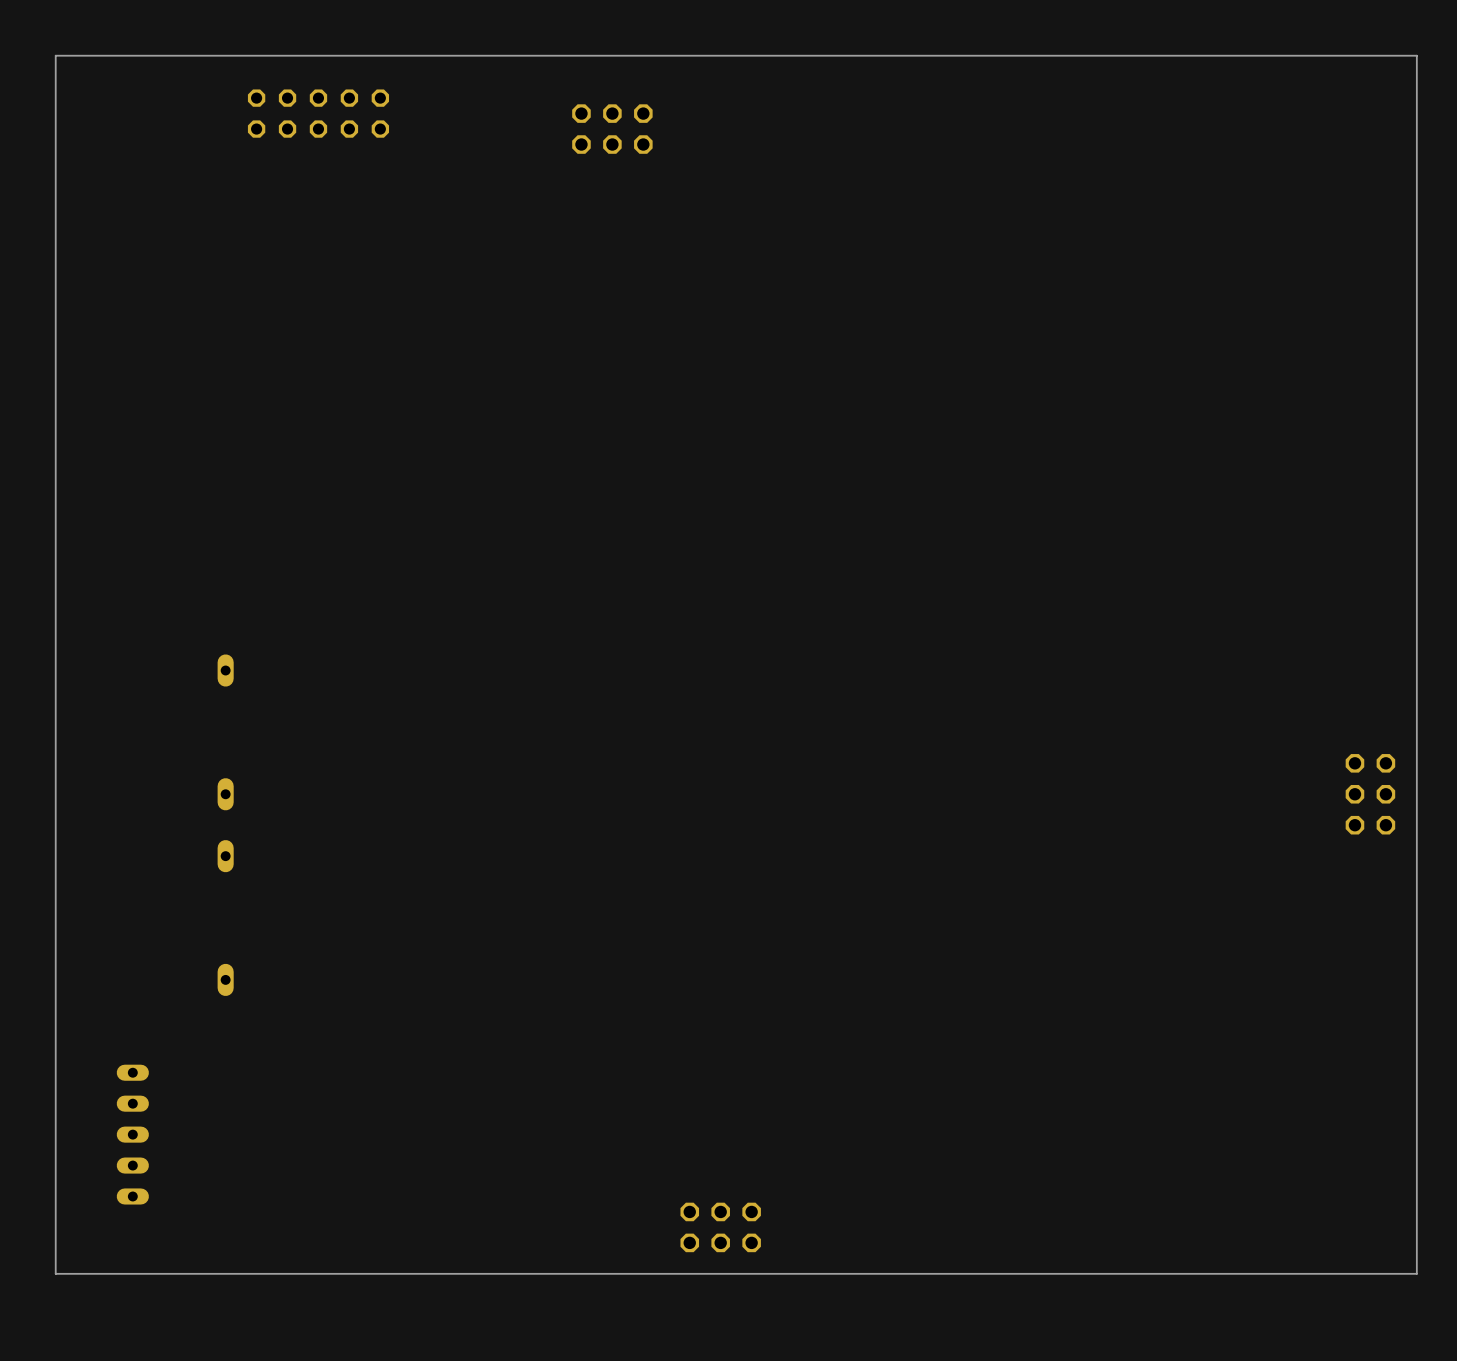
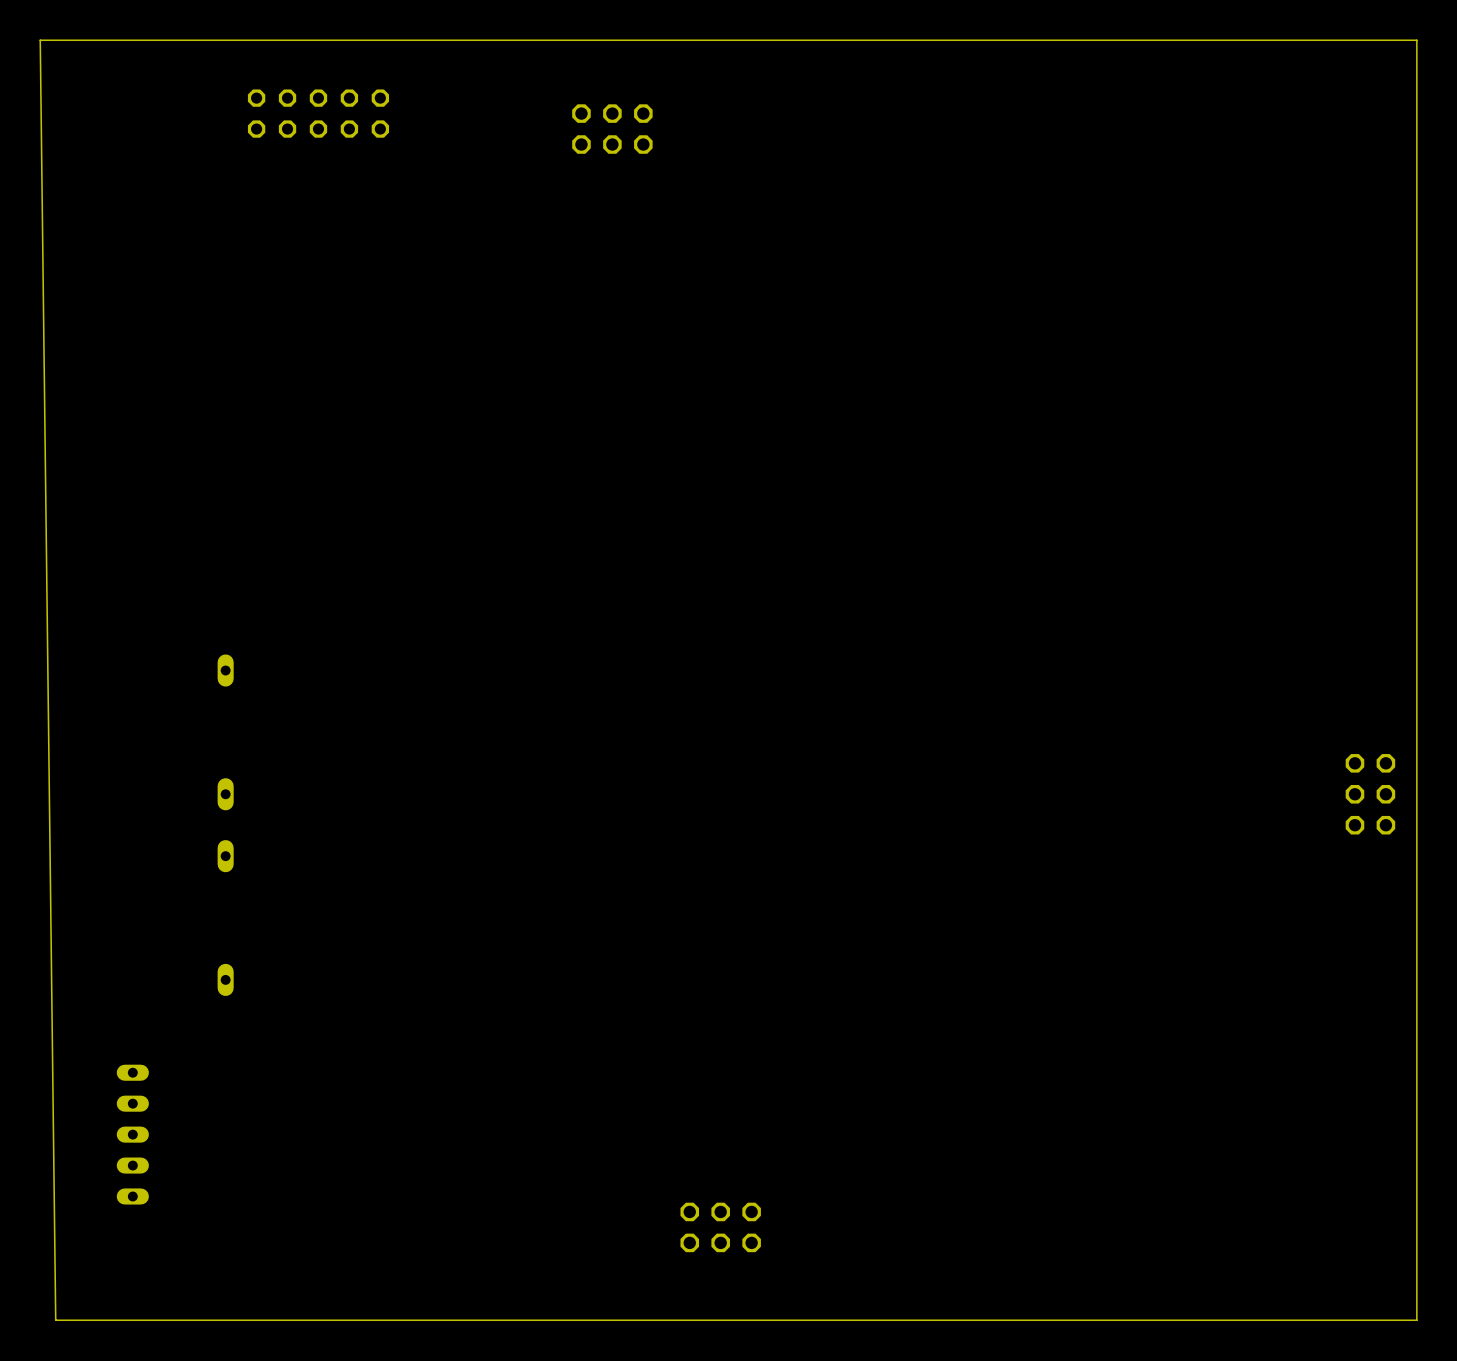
board edge: (1416, 55) (55, 55) (55, 1273) (1416, 1273) -> (1416, 55) (1416, 40) (40, 40) (55, 1320) (1416, 1320) (1416, 1273)

